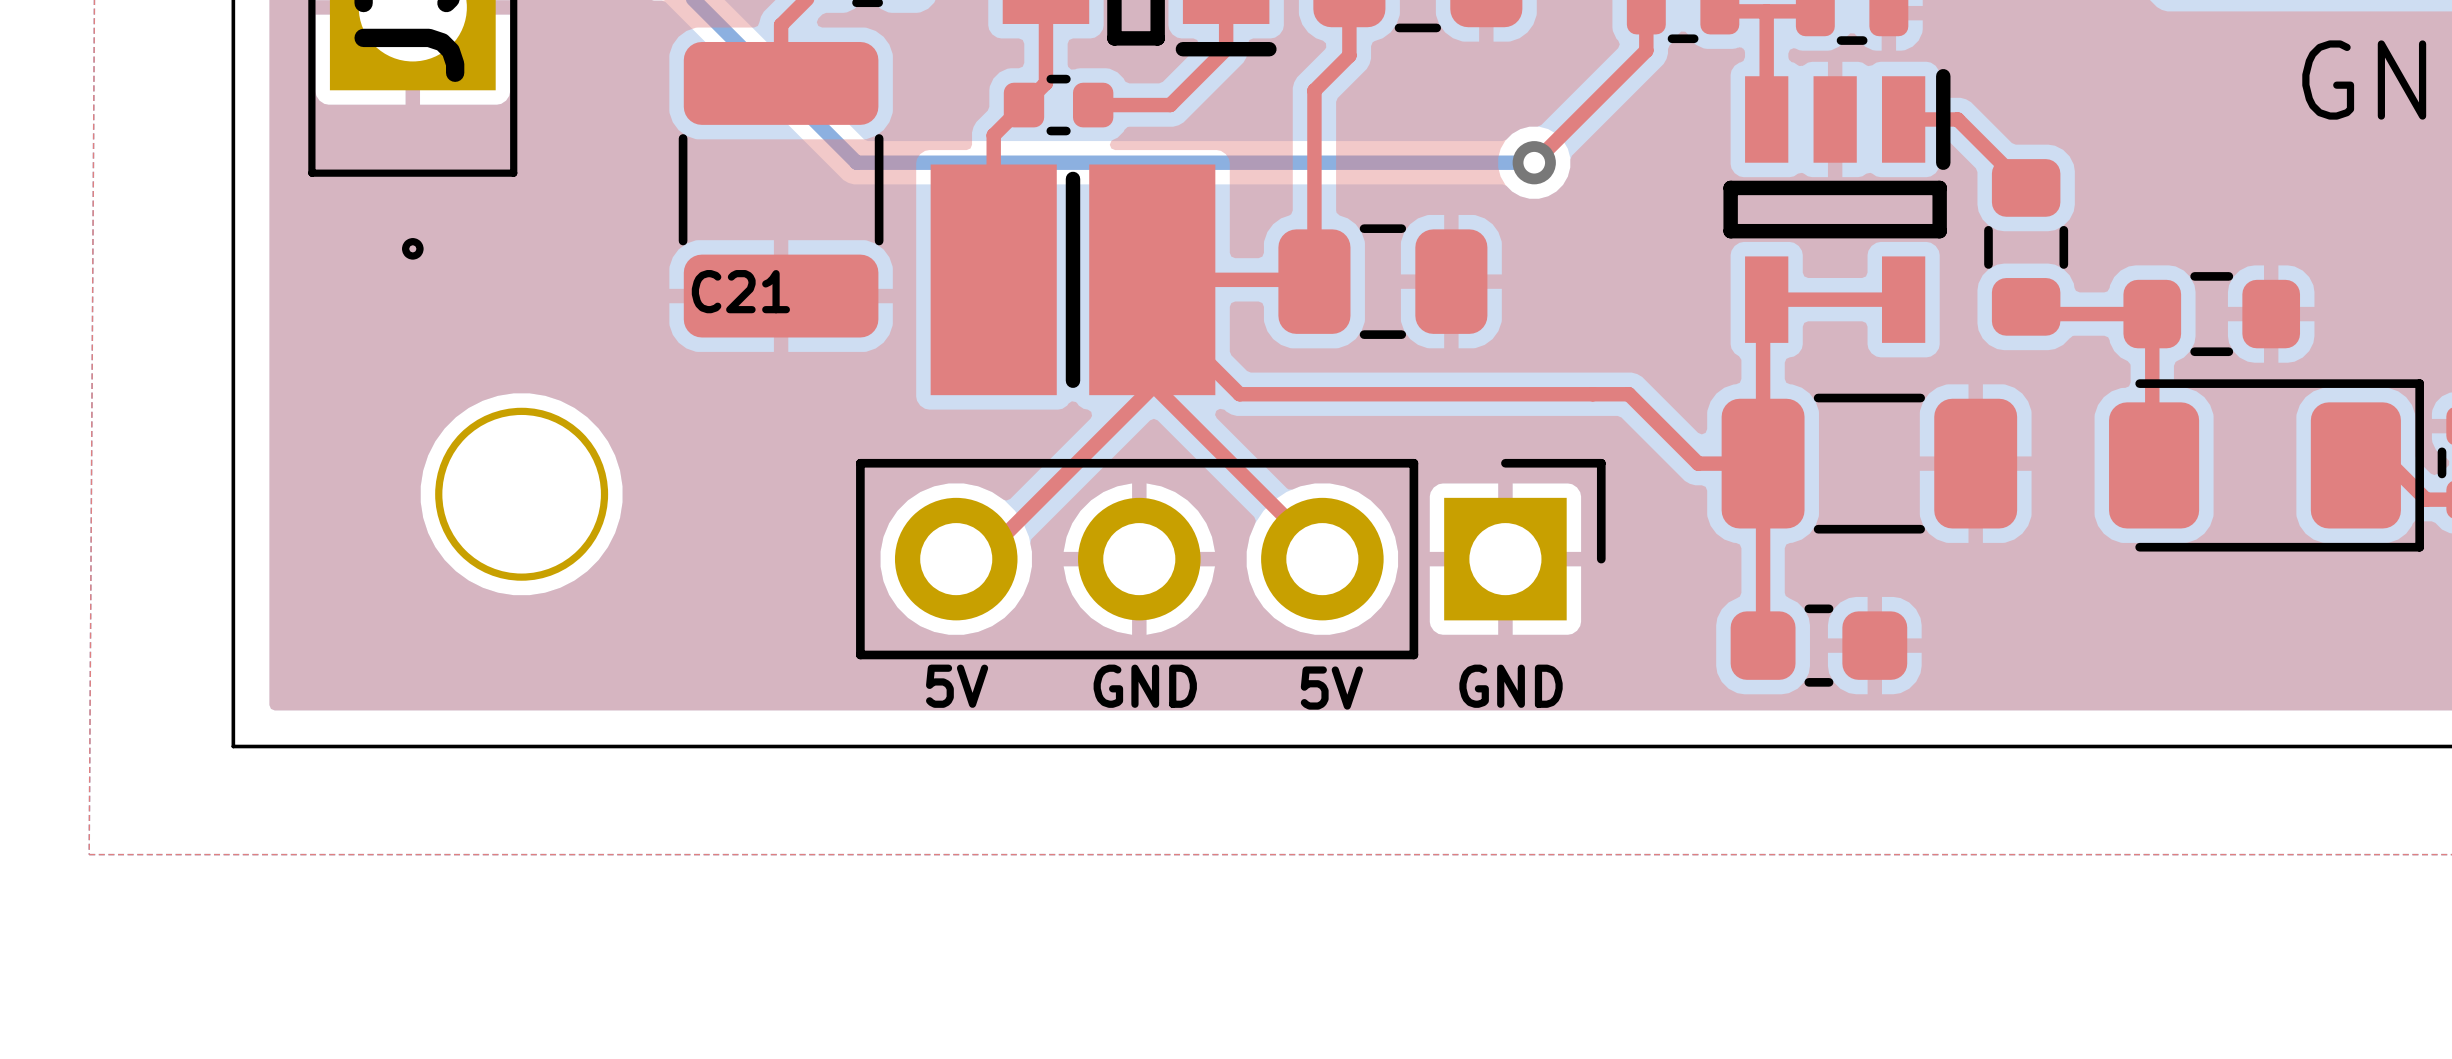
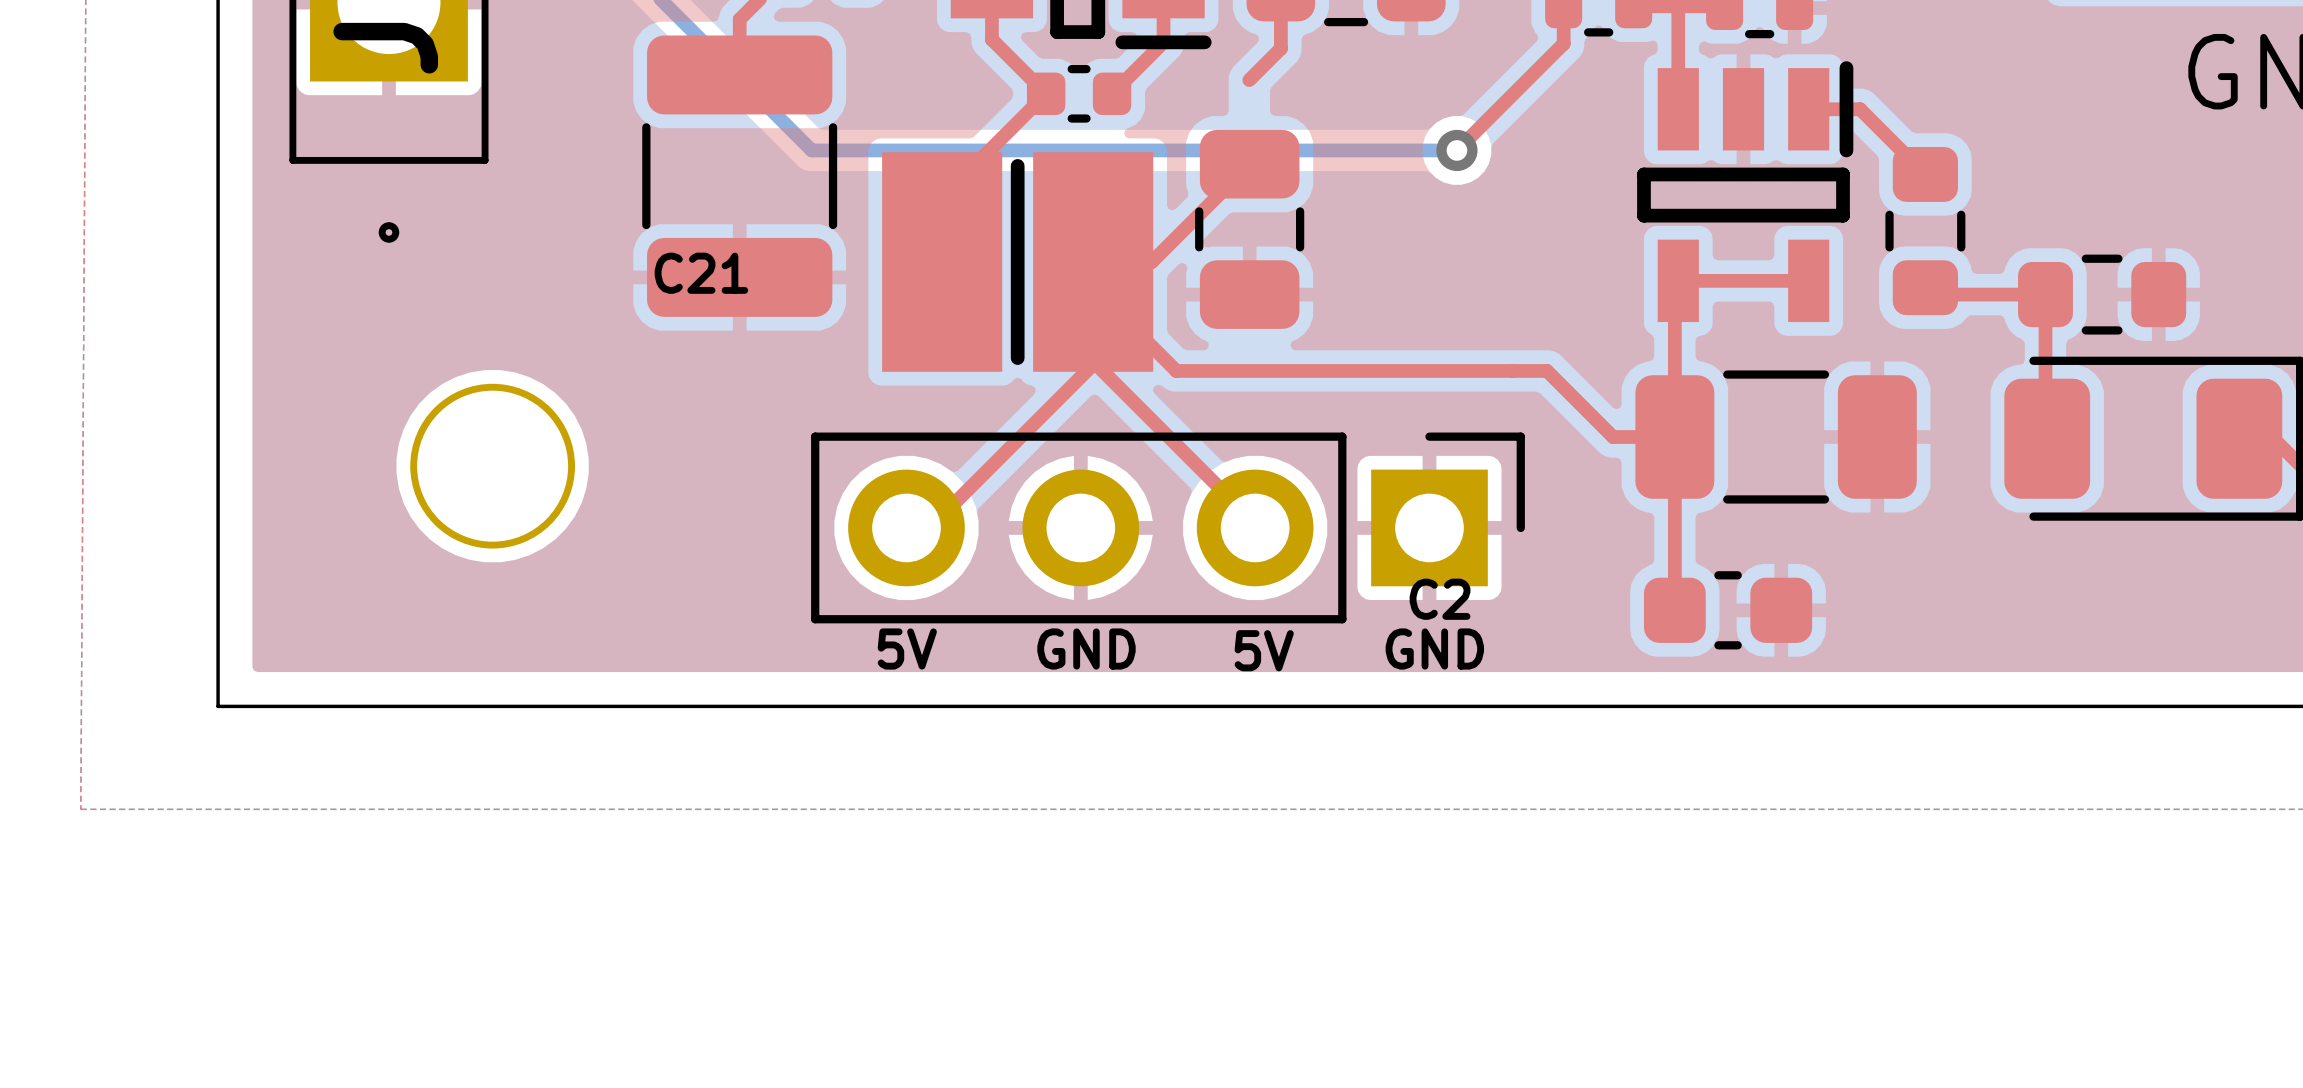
top track: (1045, 46) (1045, 83) (993, 135) (993, 212) -> (991, 39) (1046, 93) (942, 197)
top track: (1316, 88) (1314, 90) (1314, 281) (1312, 279) (1213, 279) -> (1249, 164) (1151, 261)
top track: (1172, 103) (1170, 105) (1093, 105) -> none
part position: (1058, 105) -> (1079, 93)
part rotation: 0° (1382, 281) -> 90° clockwise (1249, 229)
text: none -> C2 (1440, 599)

